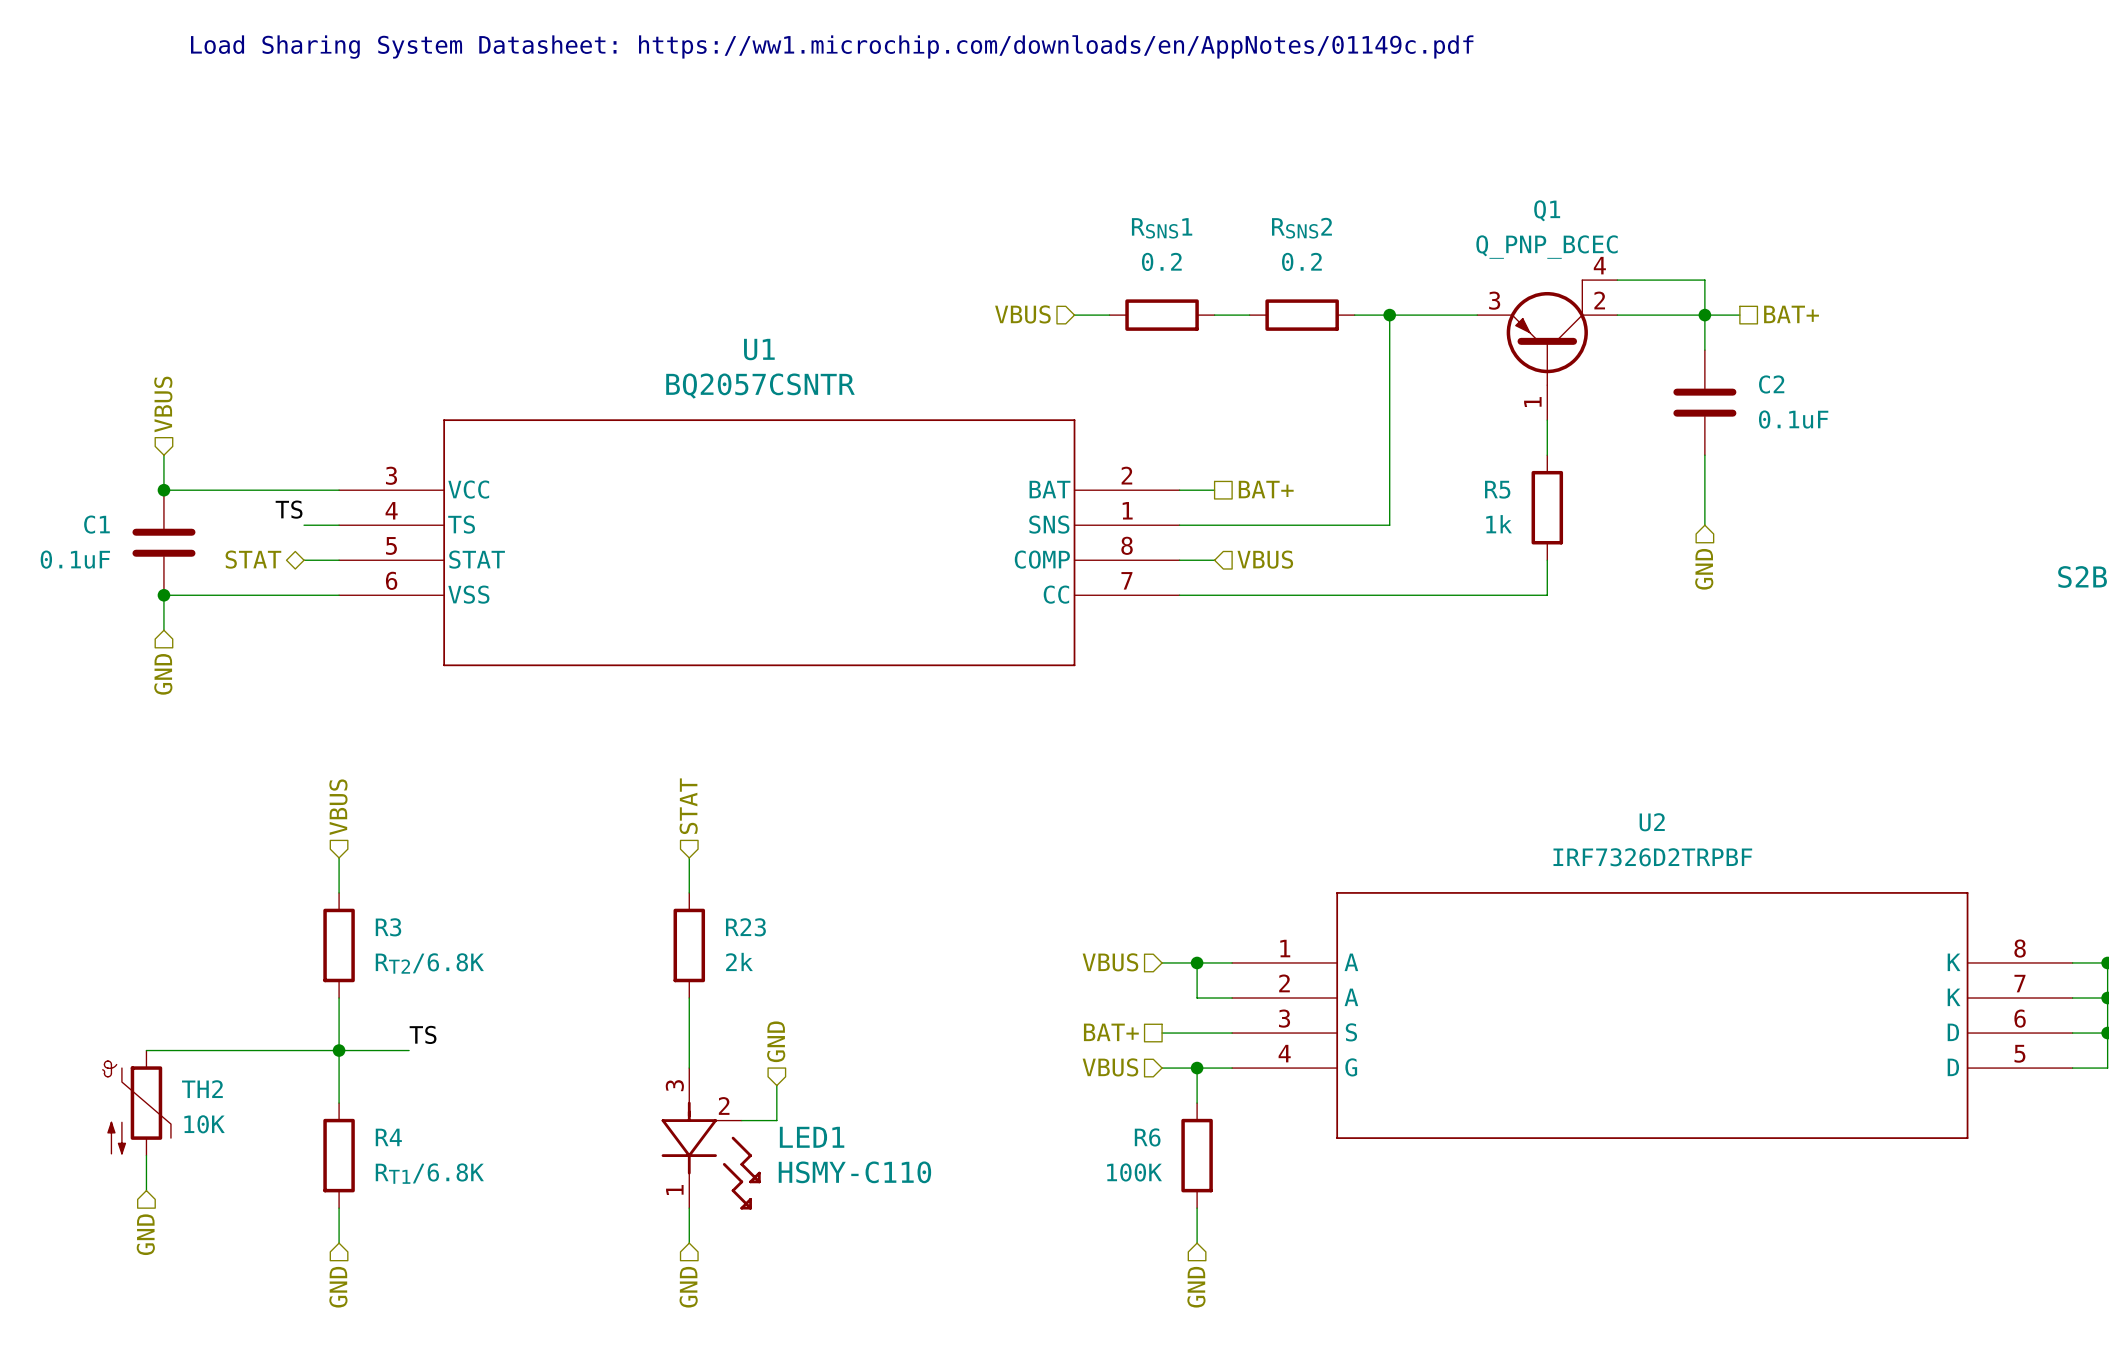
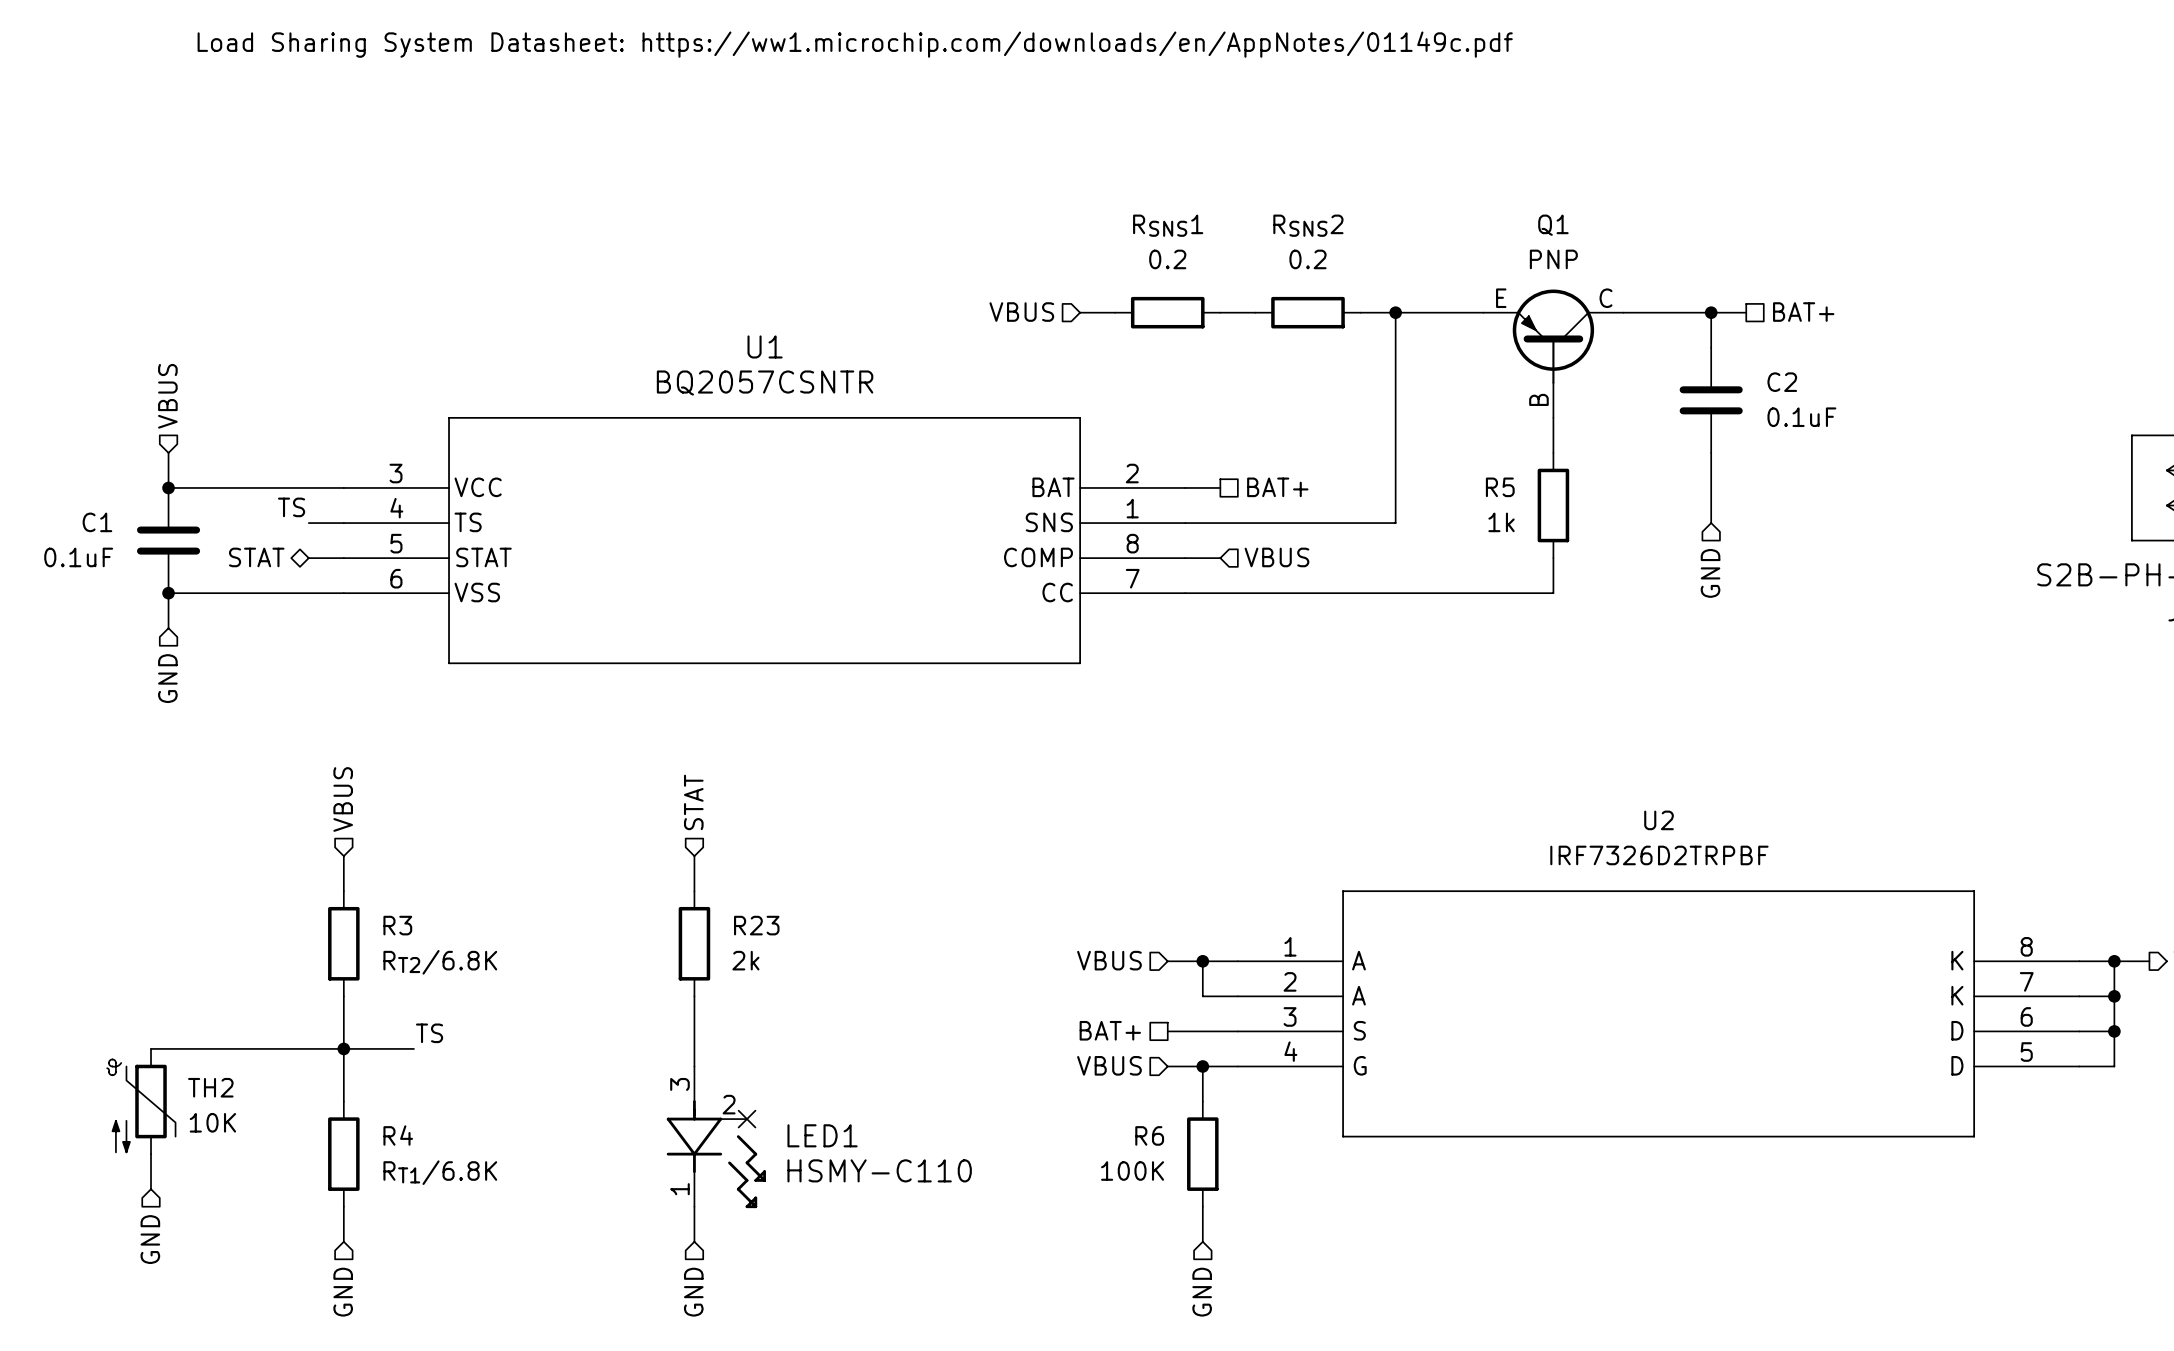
Q1 value: Q_PNP_BCEC (1547, 247) -> PNP (1553, 259)
Q1 symbol: [1477, 280, 1618, 421] -> [1483, 289, 1624, 418]
wire: (1617, 280) (1704, 280) (1704, 315) -> none
hierarchical label: GND (776, 1041) -> none
wire: (776, 1085) (776, 1120) (741, 1120) -> none
no-connect mark: none -> (747, 1119)

